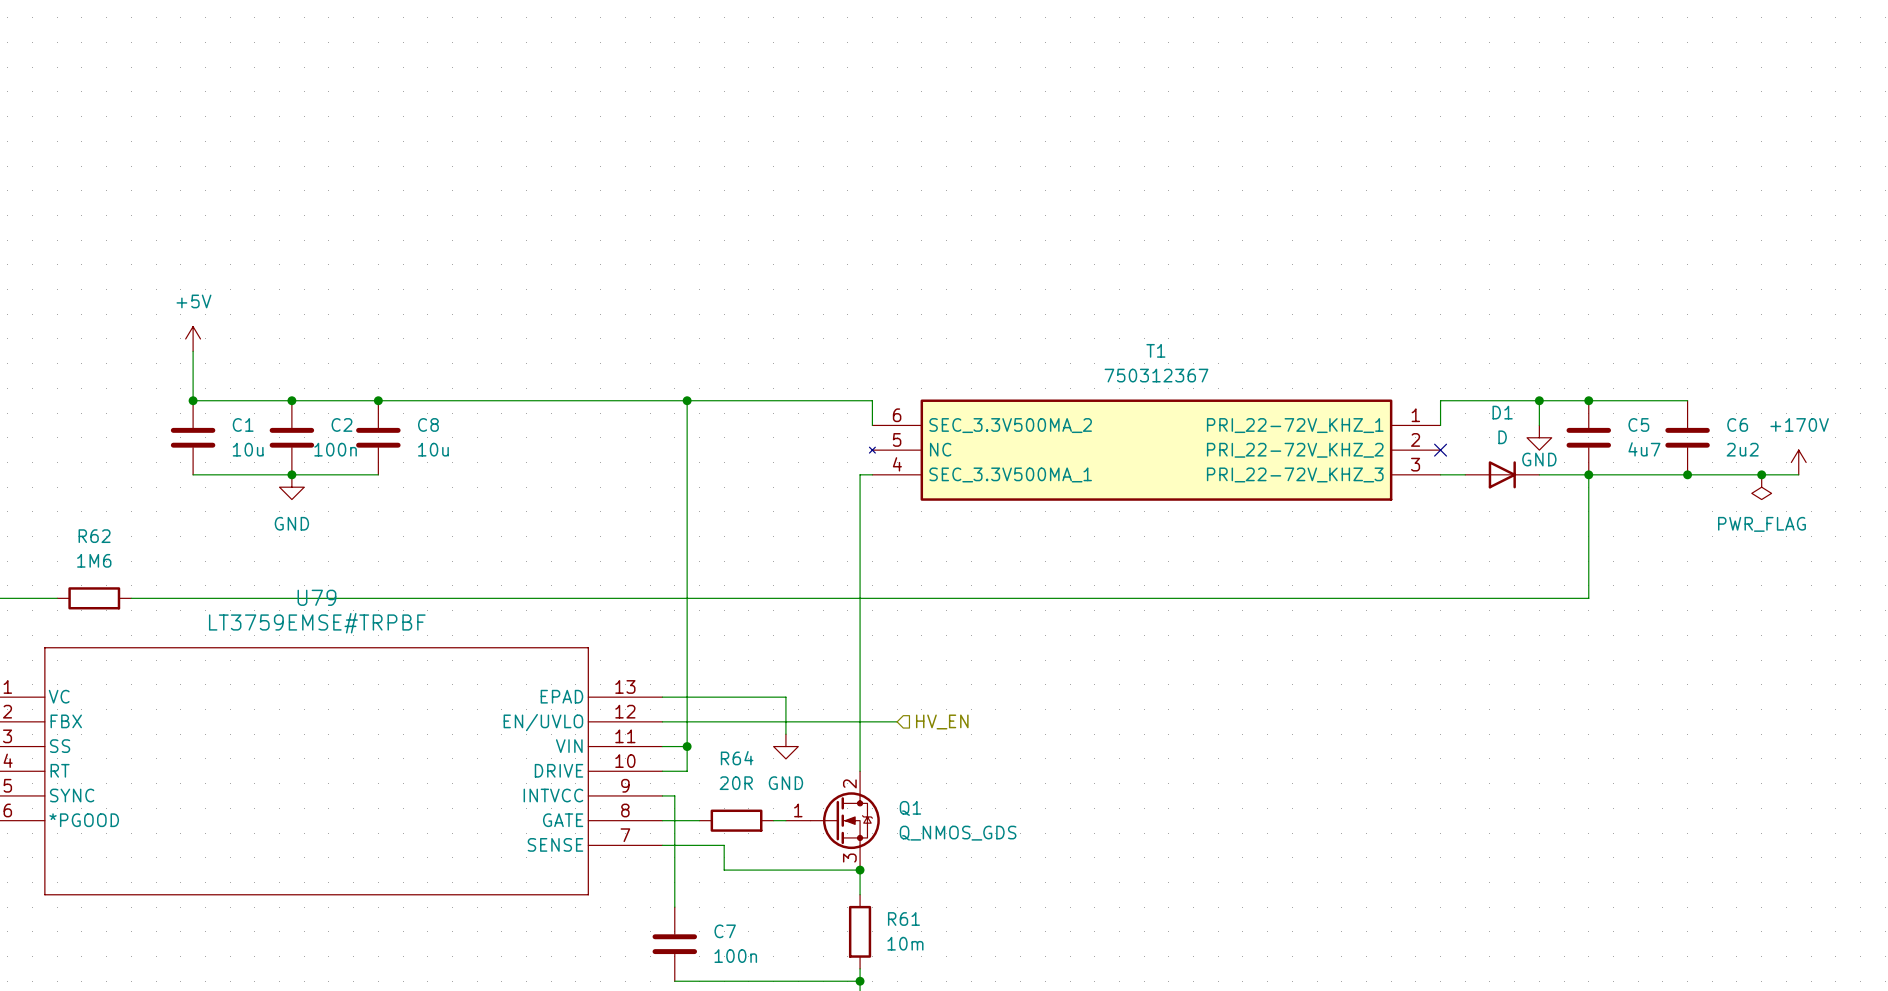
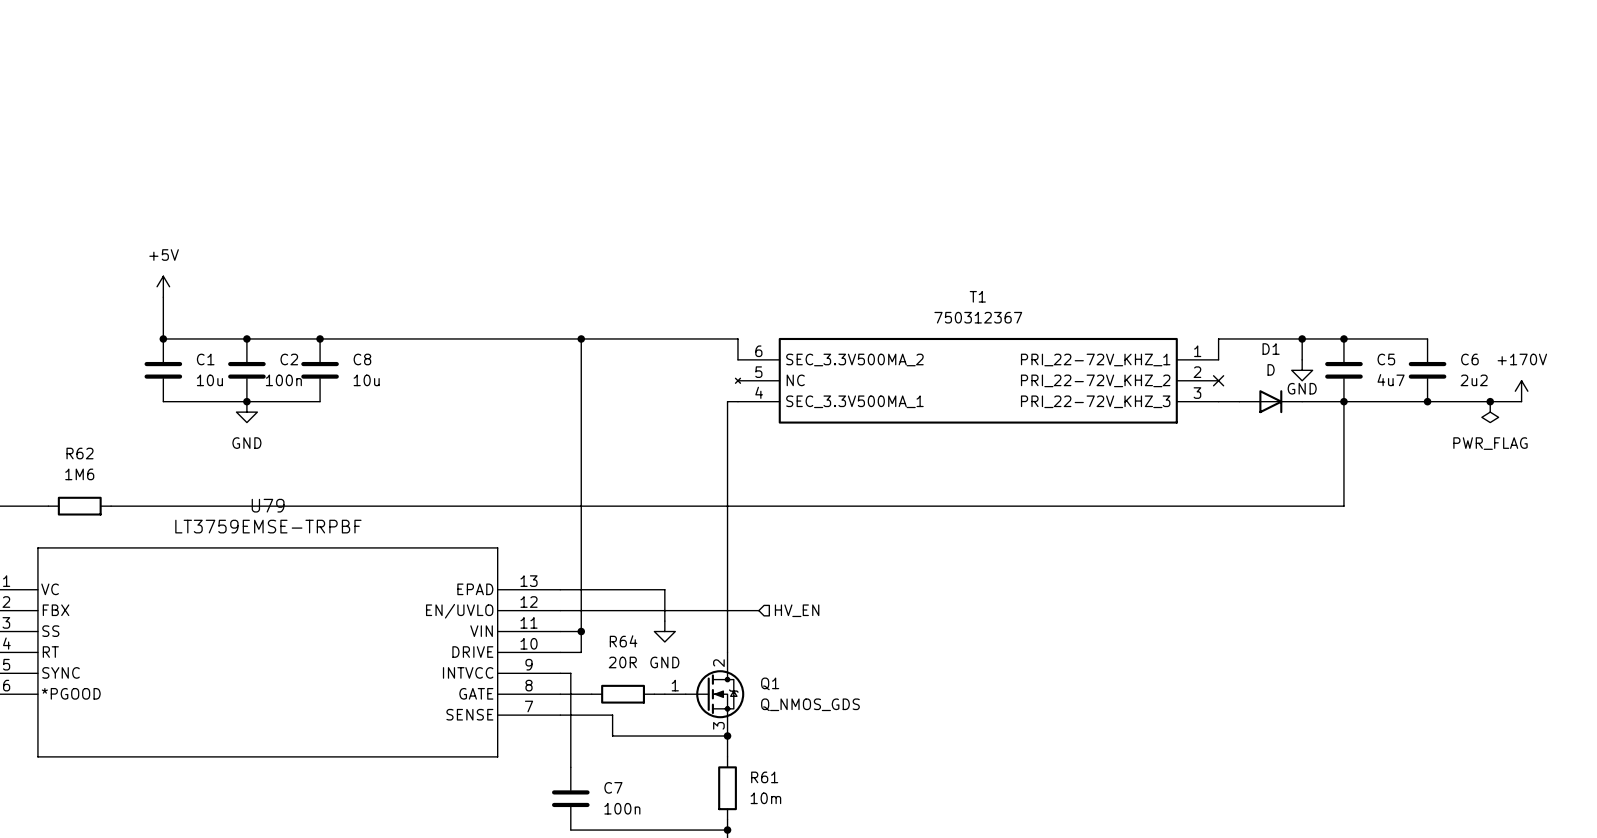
U79 value: LT3759EMSE#TRPBF (317, 623) -> LT3759EMSE-TRPBF (268, 526)

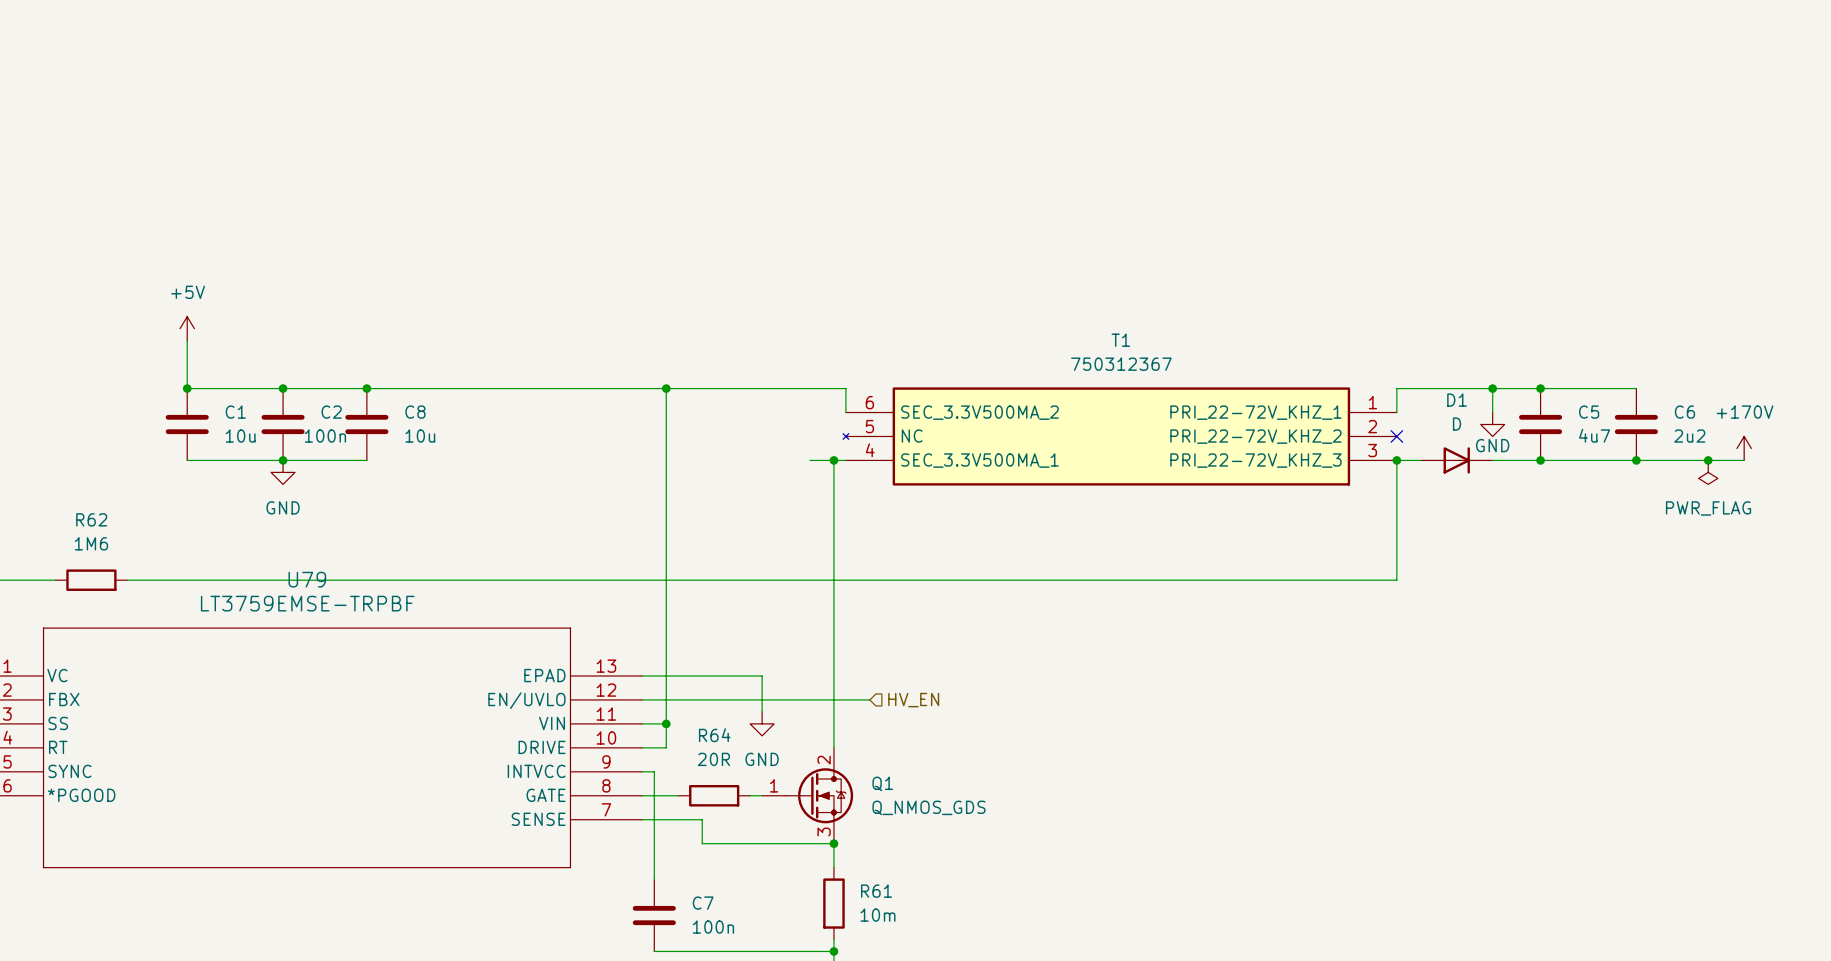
wire: none -> (810, 460) (833, 460)
junction: none -> (833, 460)
junction: none -> (1396, 460)
wire: (1343, 401) (1343, 506) (1218, 506) -> (1396, 460) (1396, 580)

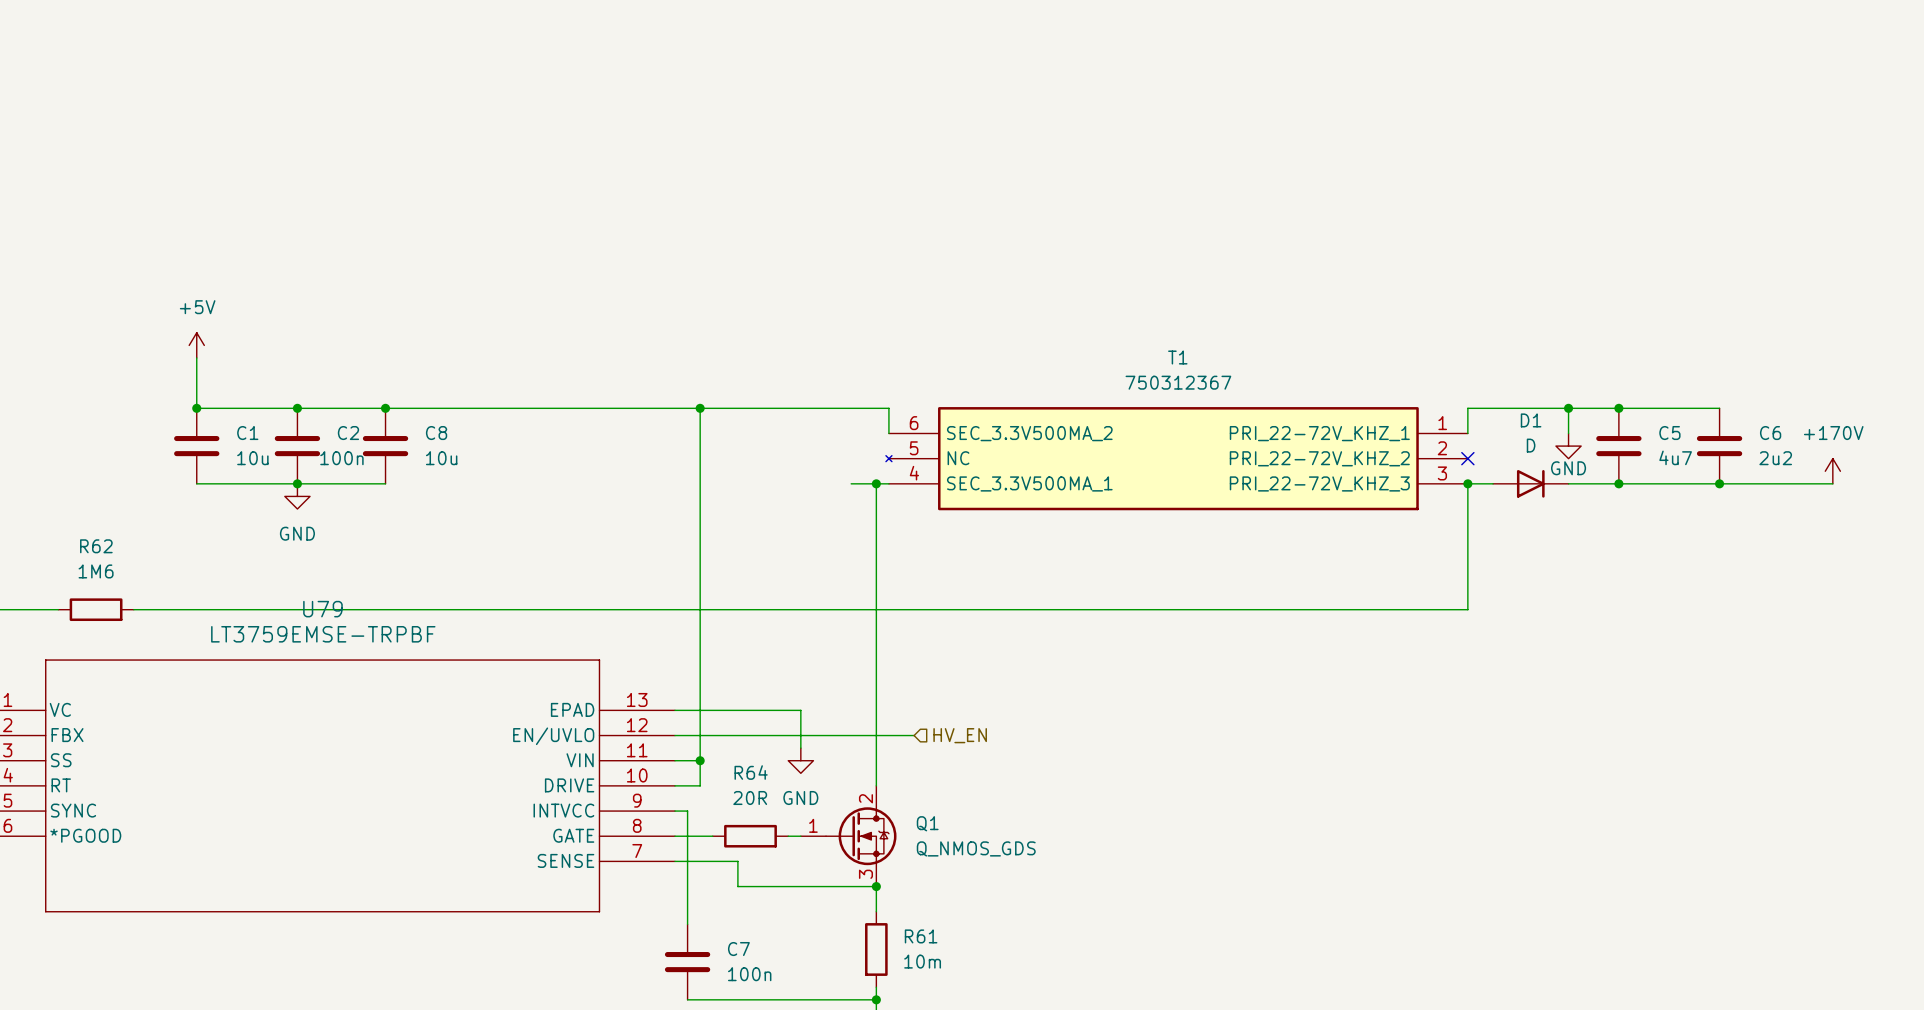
junction: (1708, 460) -> none
power symbol: PWR_FLAG (1708, 472) -> none

